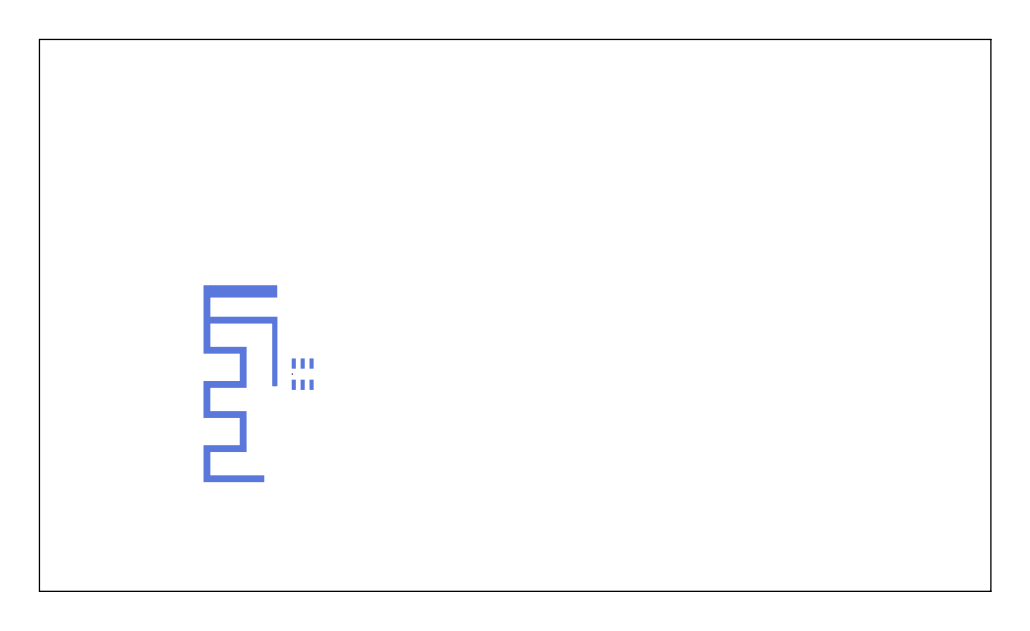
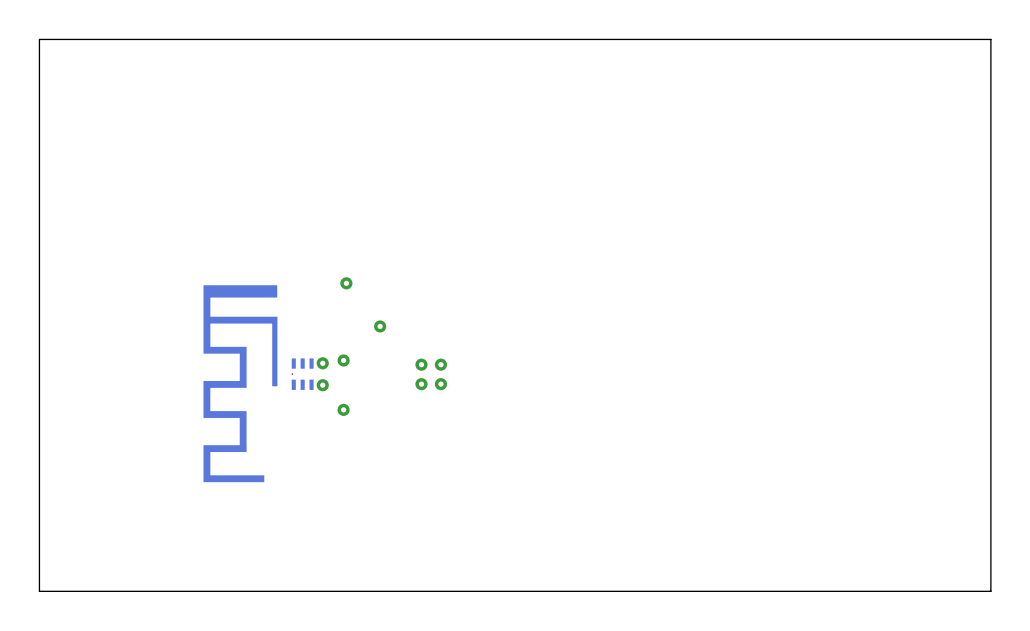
part: none -> (346, 283)
part: none -> (380, 326)
part: none -> (343, 360)
part: none -> (322, 363)
part: none -> (421, 364)
part: none -> (440, 364)
part: none -> (421, 384)
part: none -> (440, 384)
part: none -> (322, 385)
part: none -> (343, 409)

